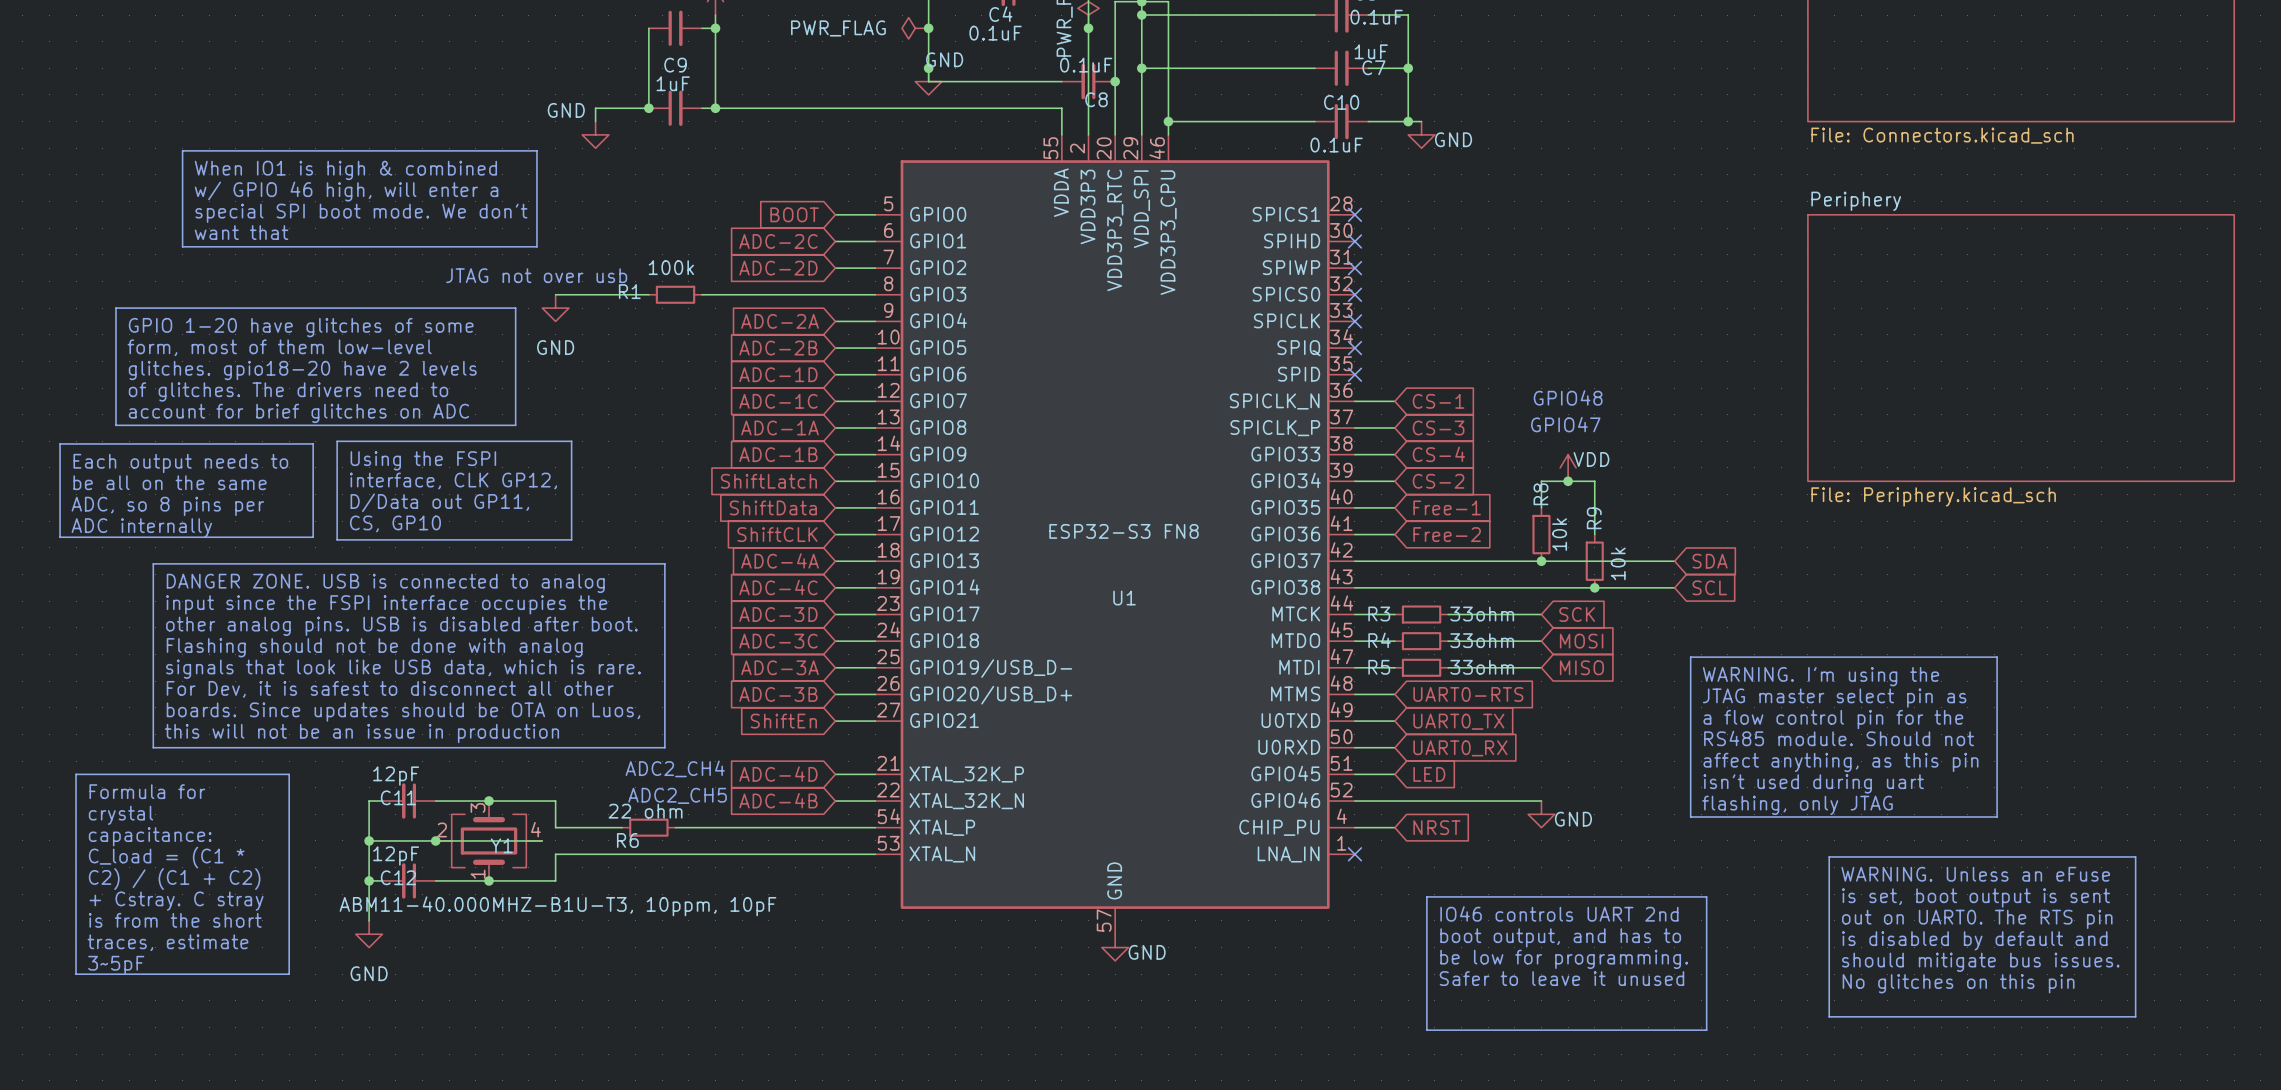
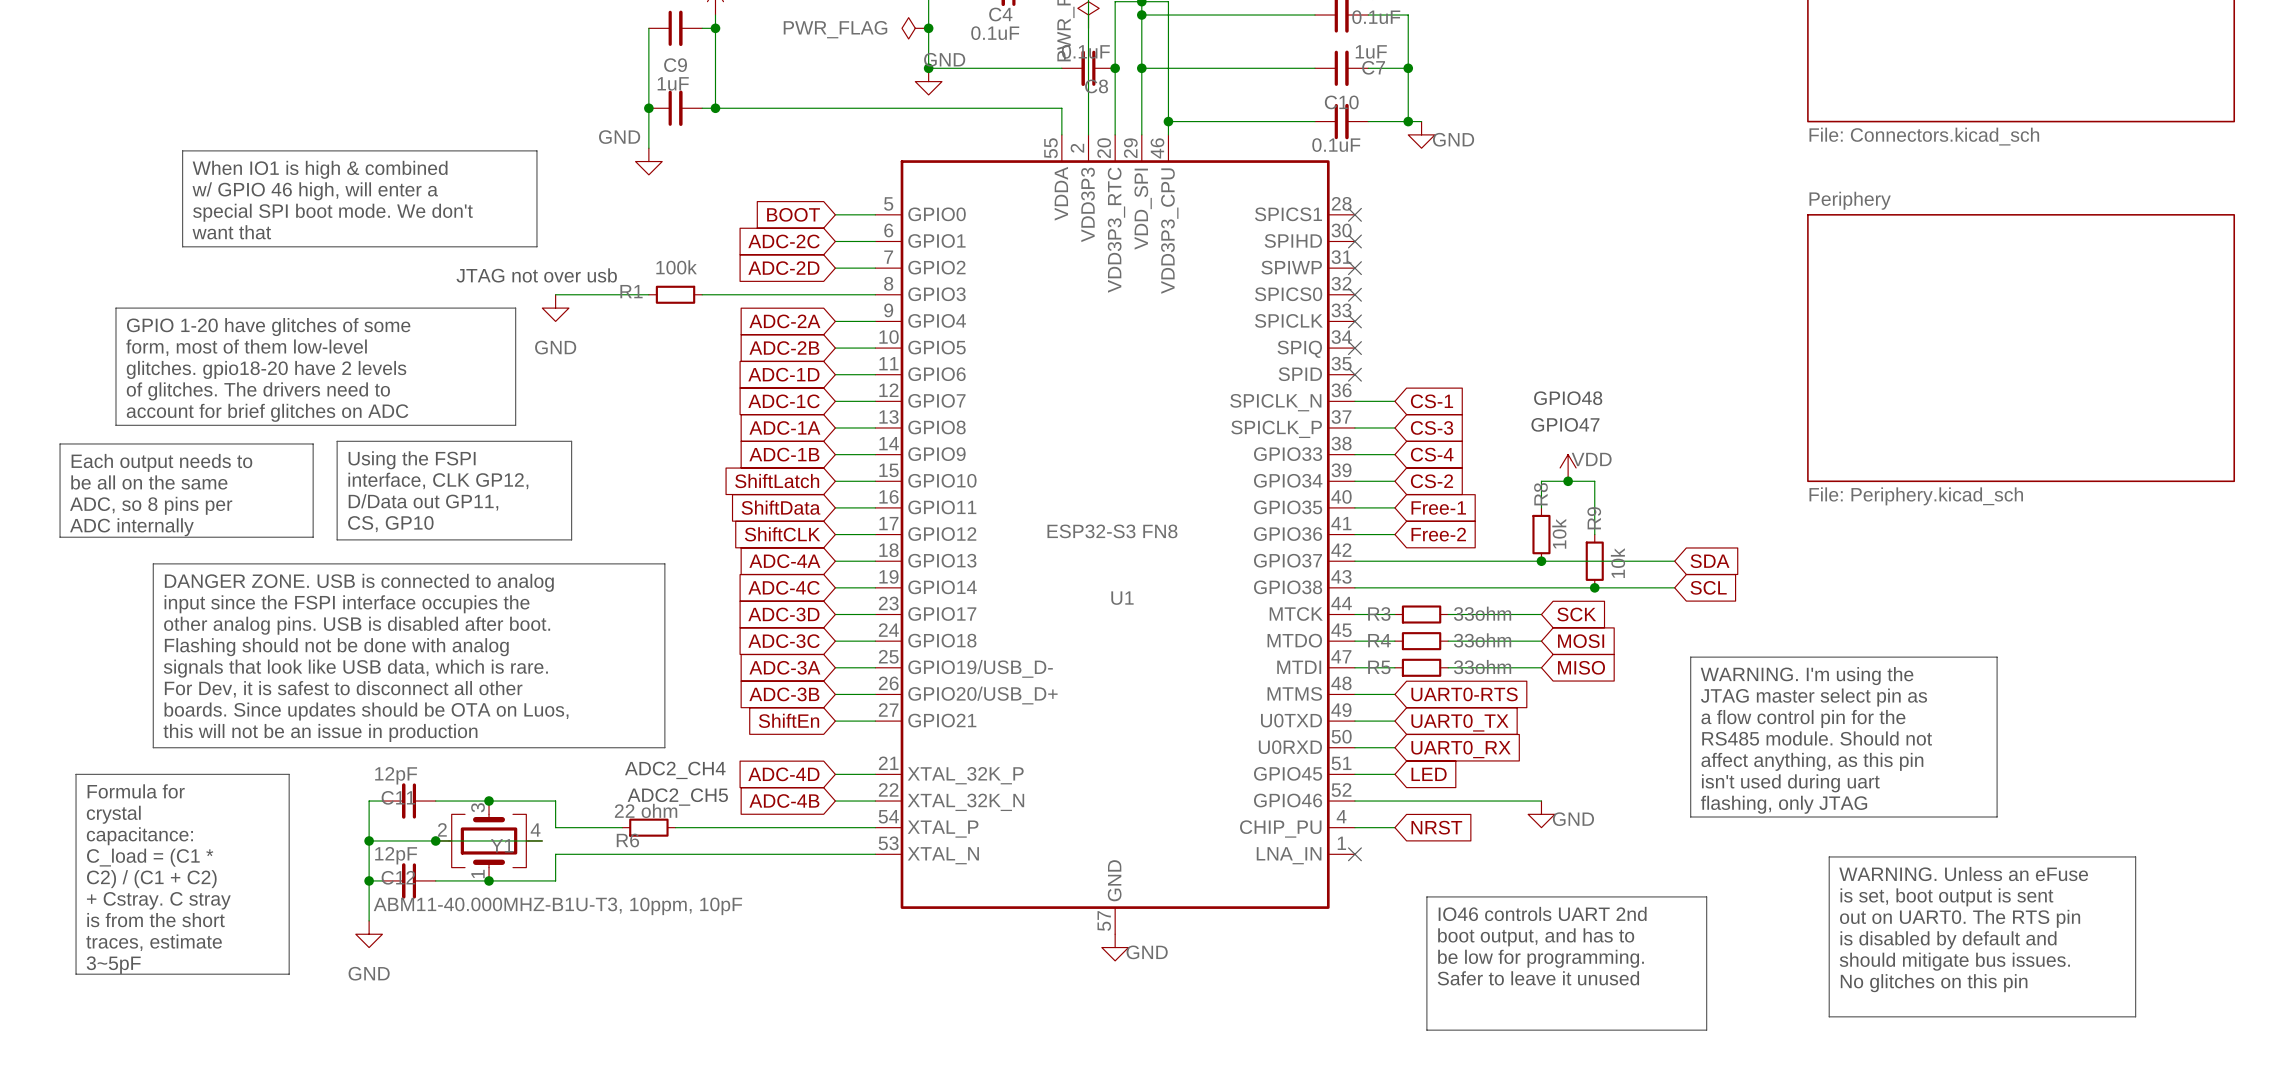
junction: (1088, 28) -> none
wire: (928, 68) (928, 81) (1061, 81) -> (928, 68) (1061, 68)
C8 position: (1088, 81) -> (1088, 68)
junction position: (1115, 81) -> (1115, 68)
wire: (648, 108) (595, 108) (595, 121) -> (648, 108) (648, 148)
power symbol position: GND (595, 134) -> GND (648, 161)

